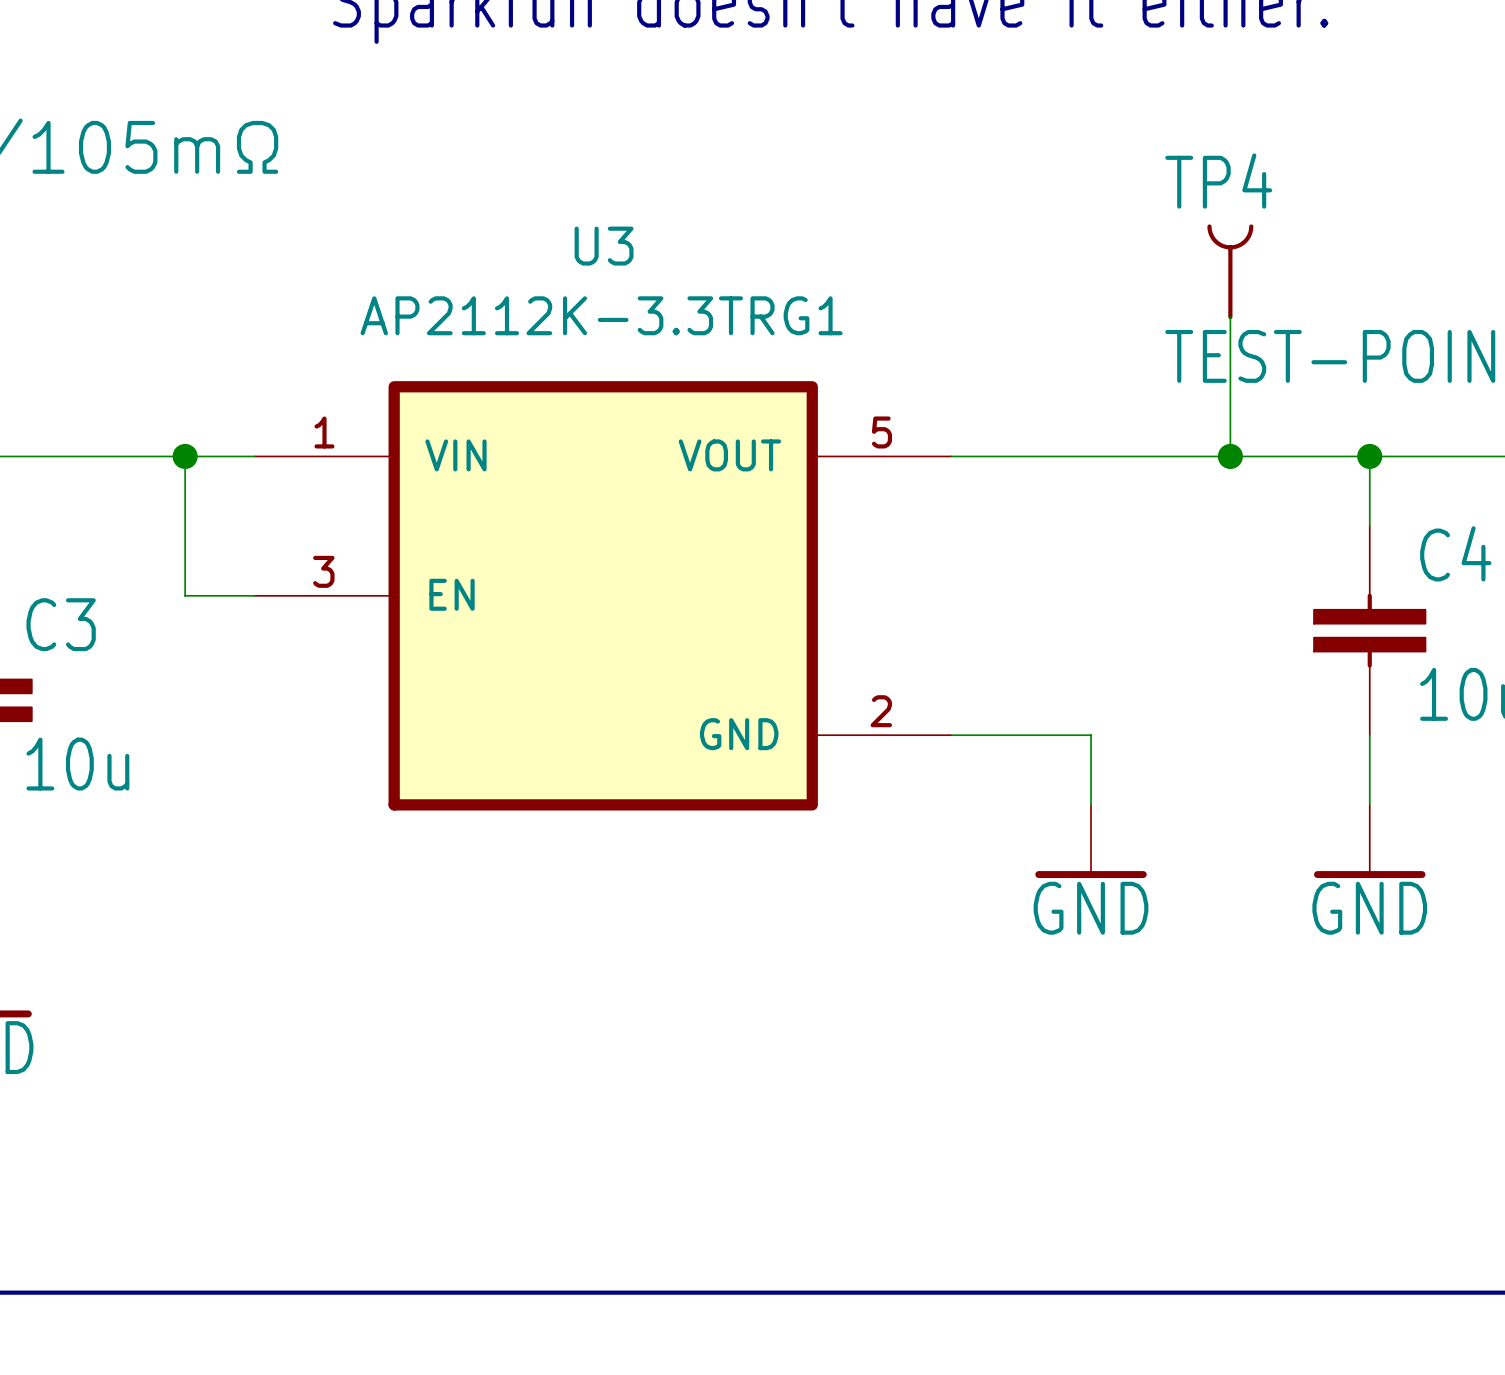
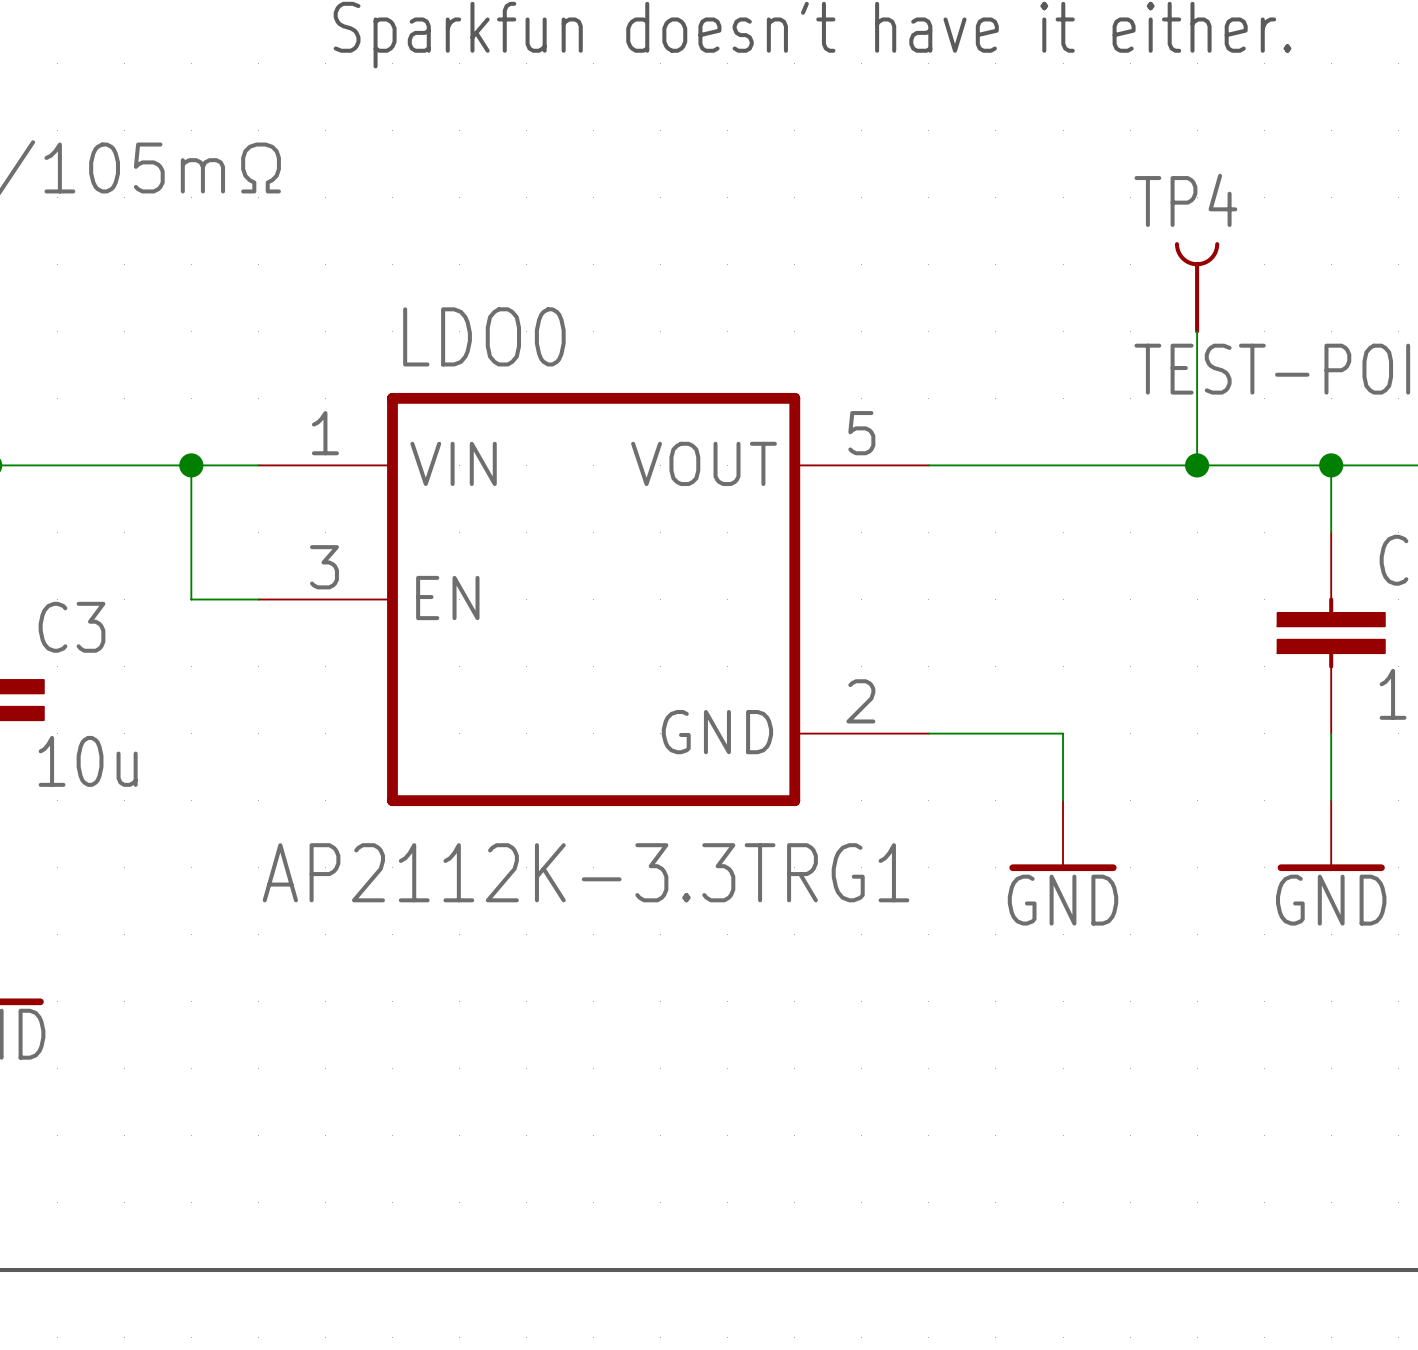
U3: AP2112K-3.3TRG1 (603, 595) -> none
LDO0: none -> AP2112K-3.3TRG1 (593, 599)

